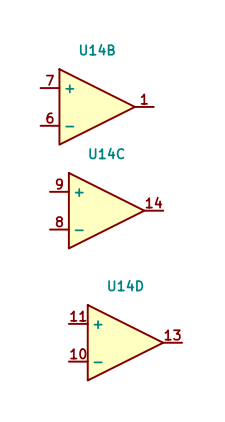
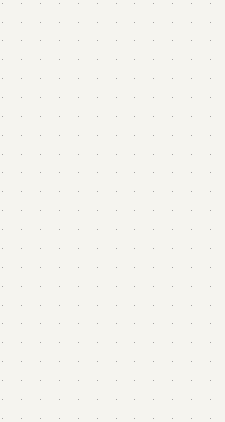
U14B: (97, 106) -> none
U14C: (106, 210) -> none
U14D: (125, 342) -> none

